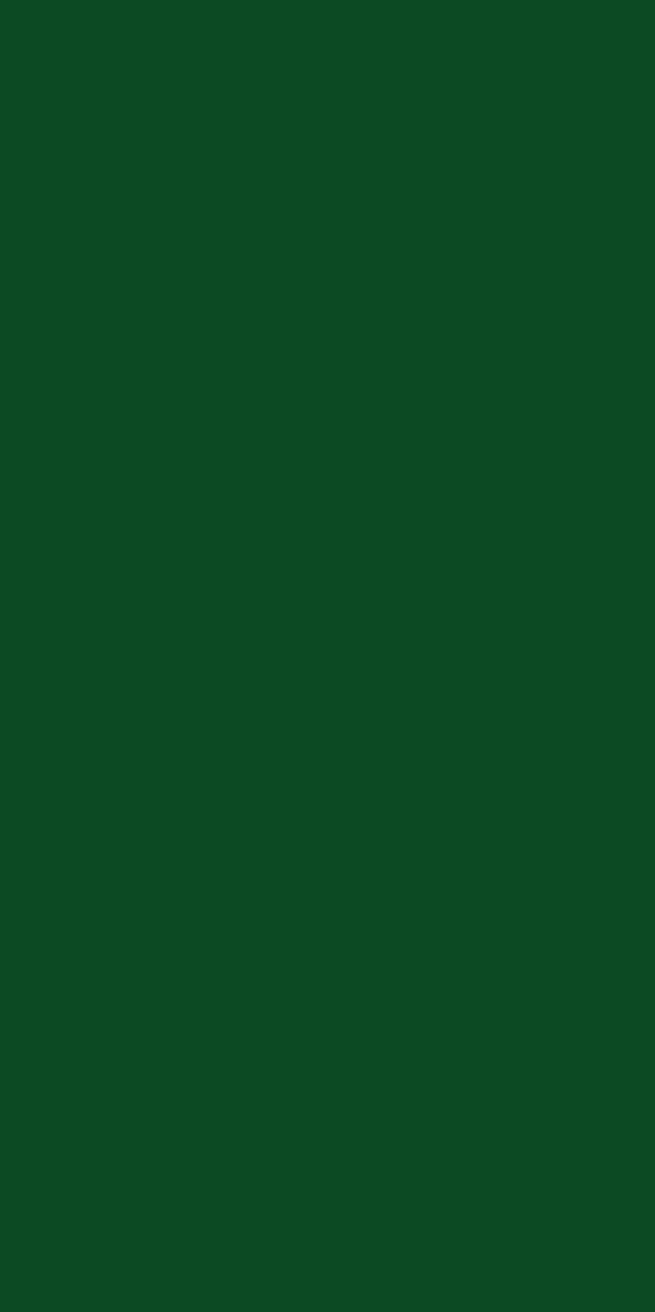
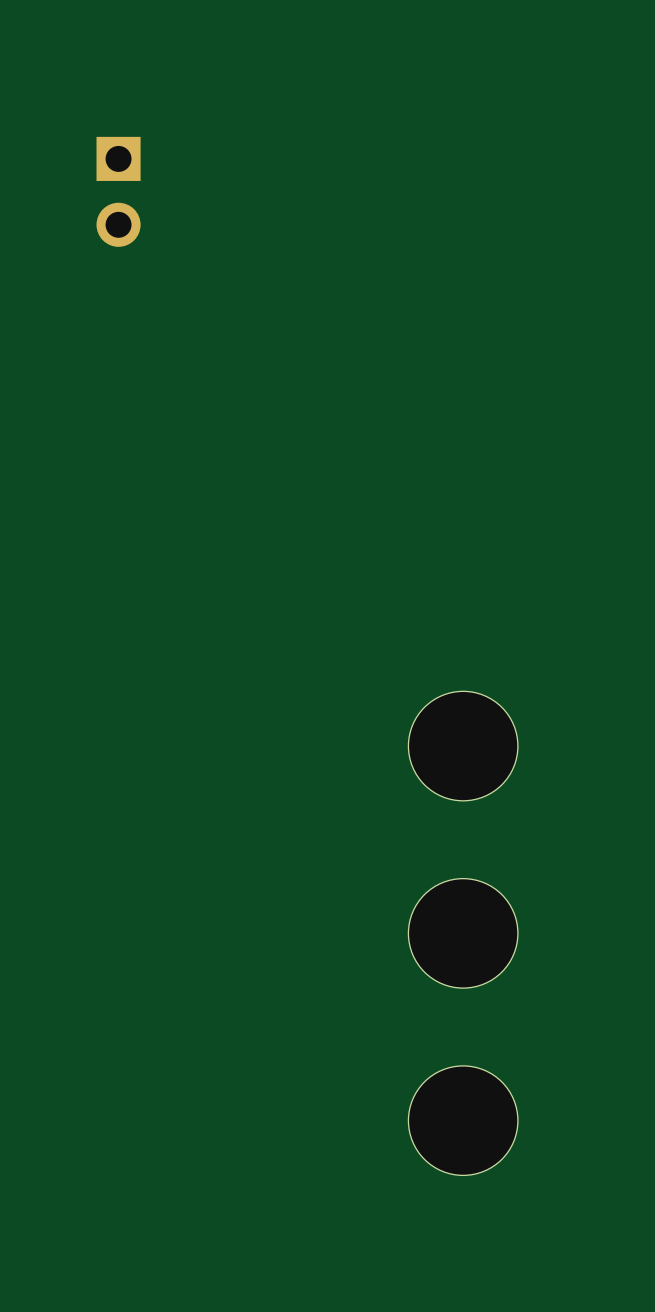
part: none -> (118, 191)
part: none -> (463, 746)
part: none -> (463, 933)
part: none -> (463, 1120)

